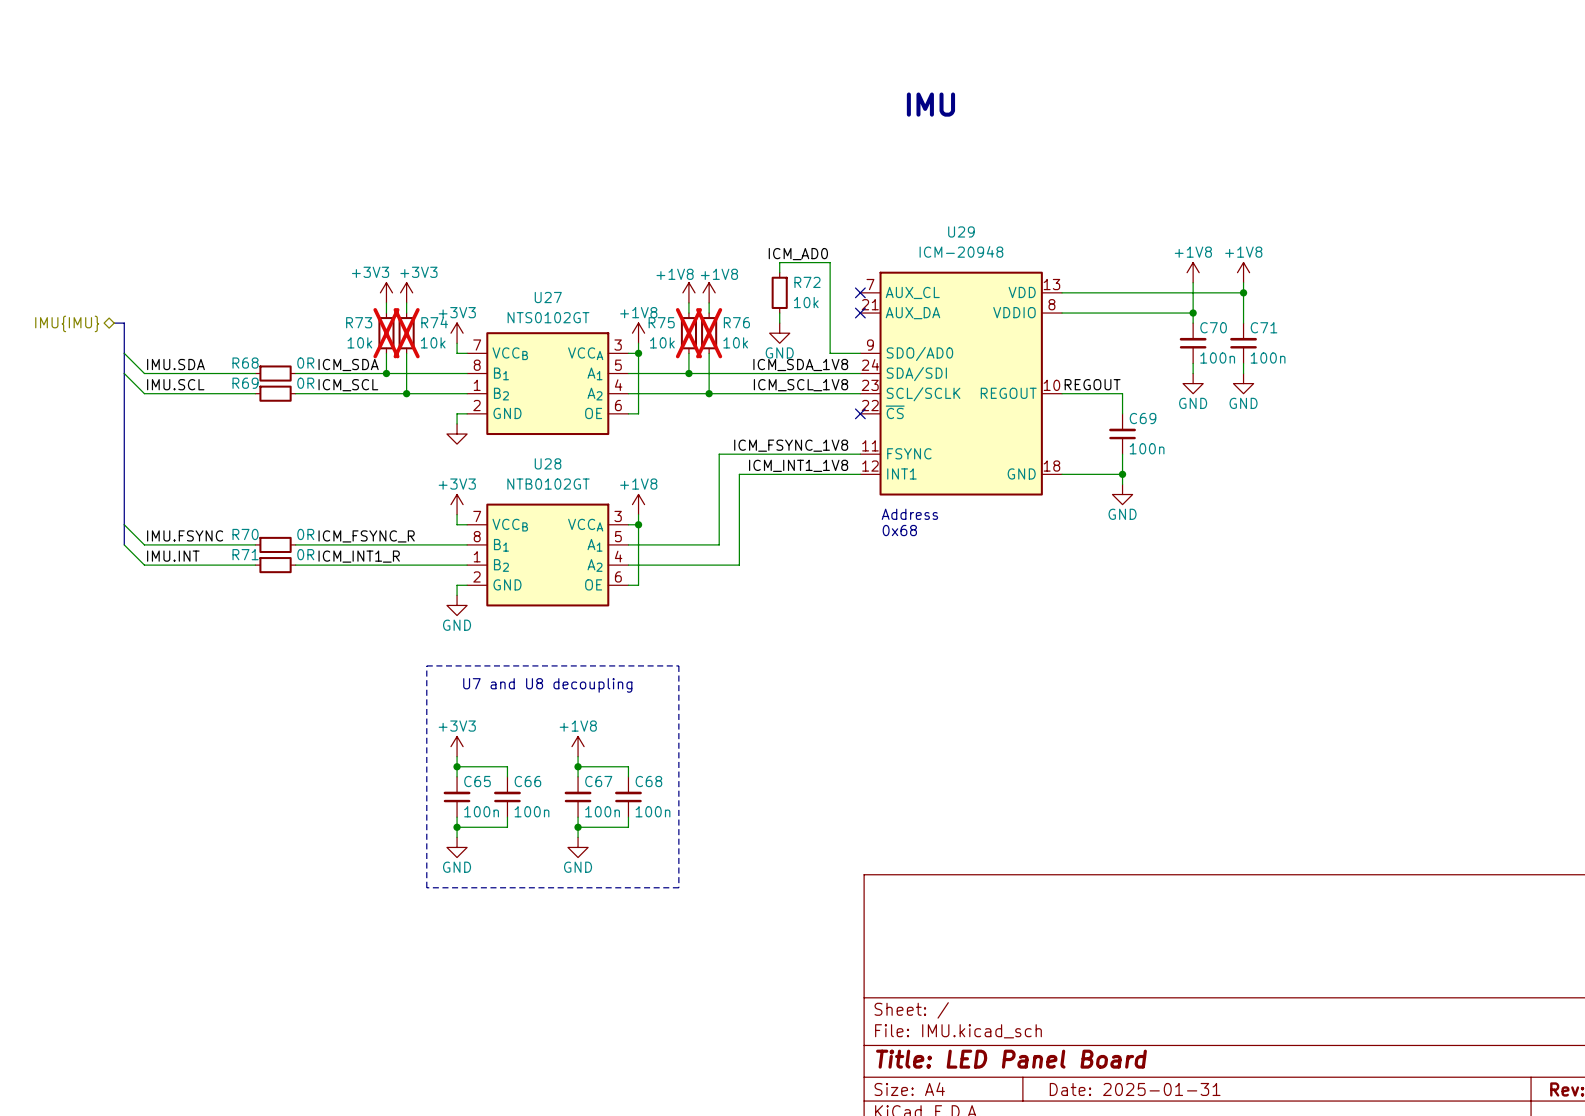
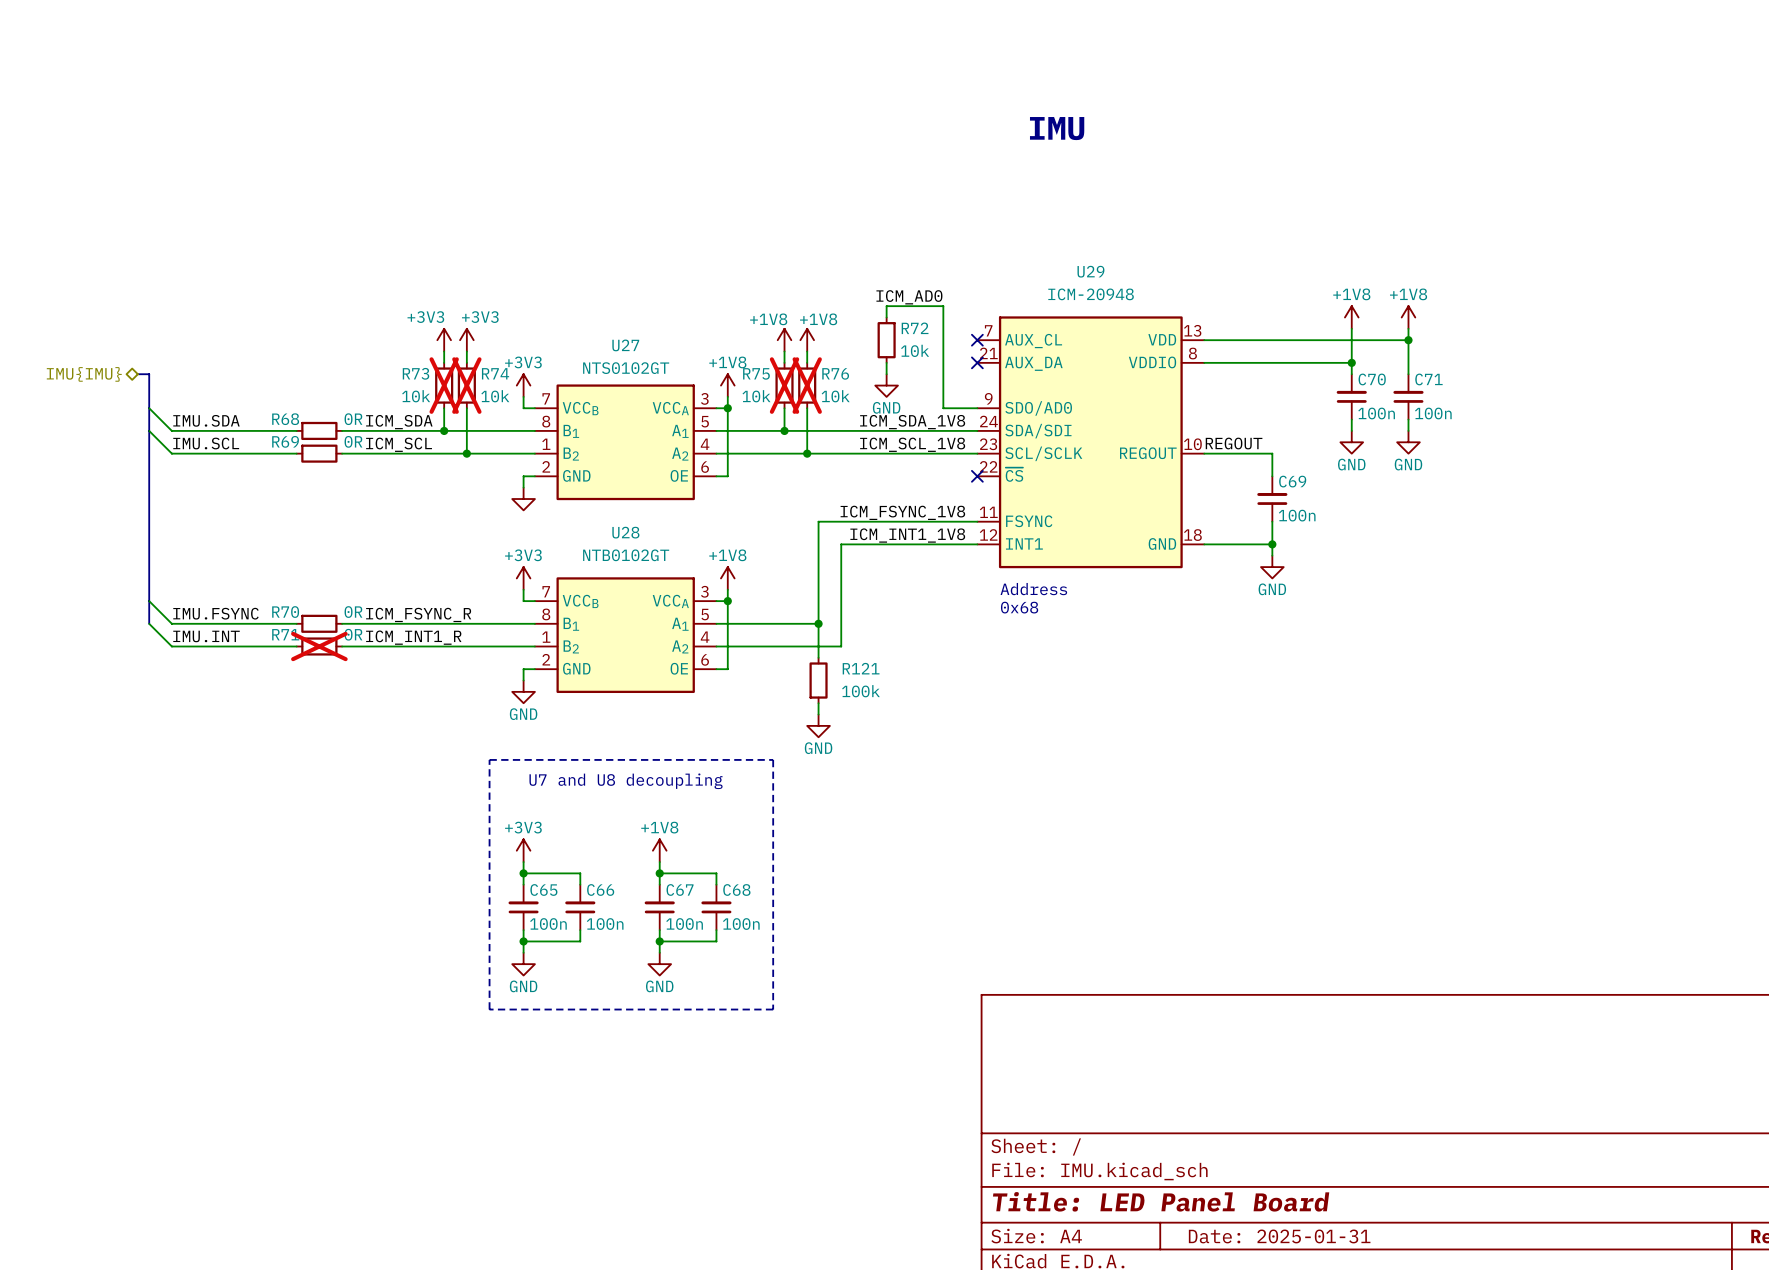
wire: none -> (818, 623) (818, 657)
junction: none -> (818, 623)
R71 do-not-place cross: none -> (319, 646)
R121: none -> (818, 680)
wire: none -> (818, 703) (818, 714)
power symbol: none -> GND (818, 725)

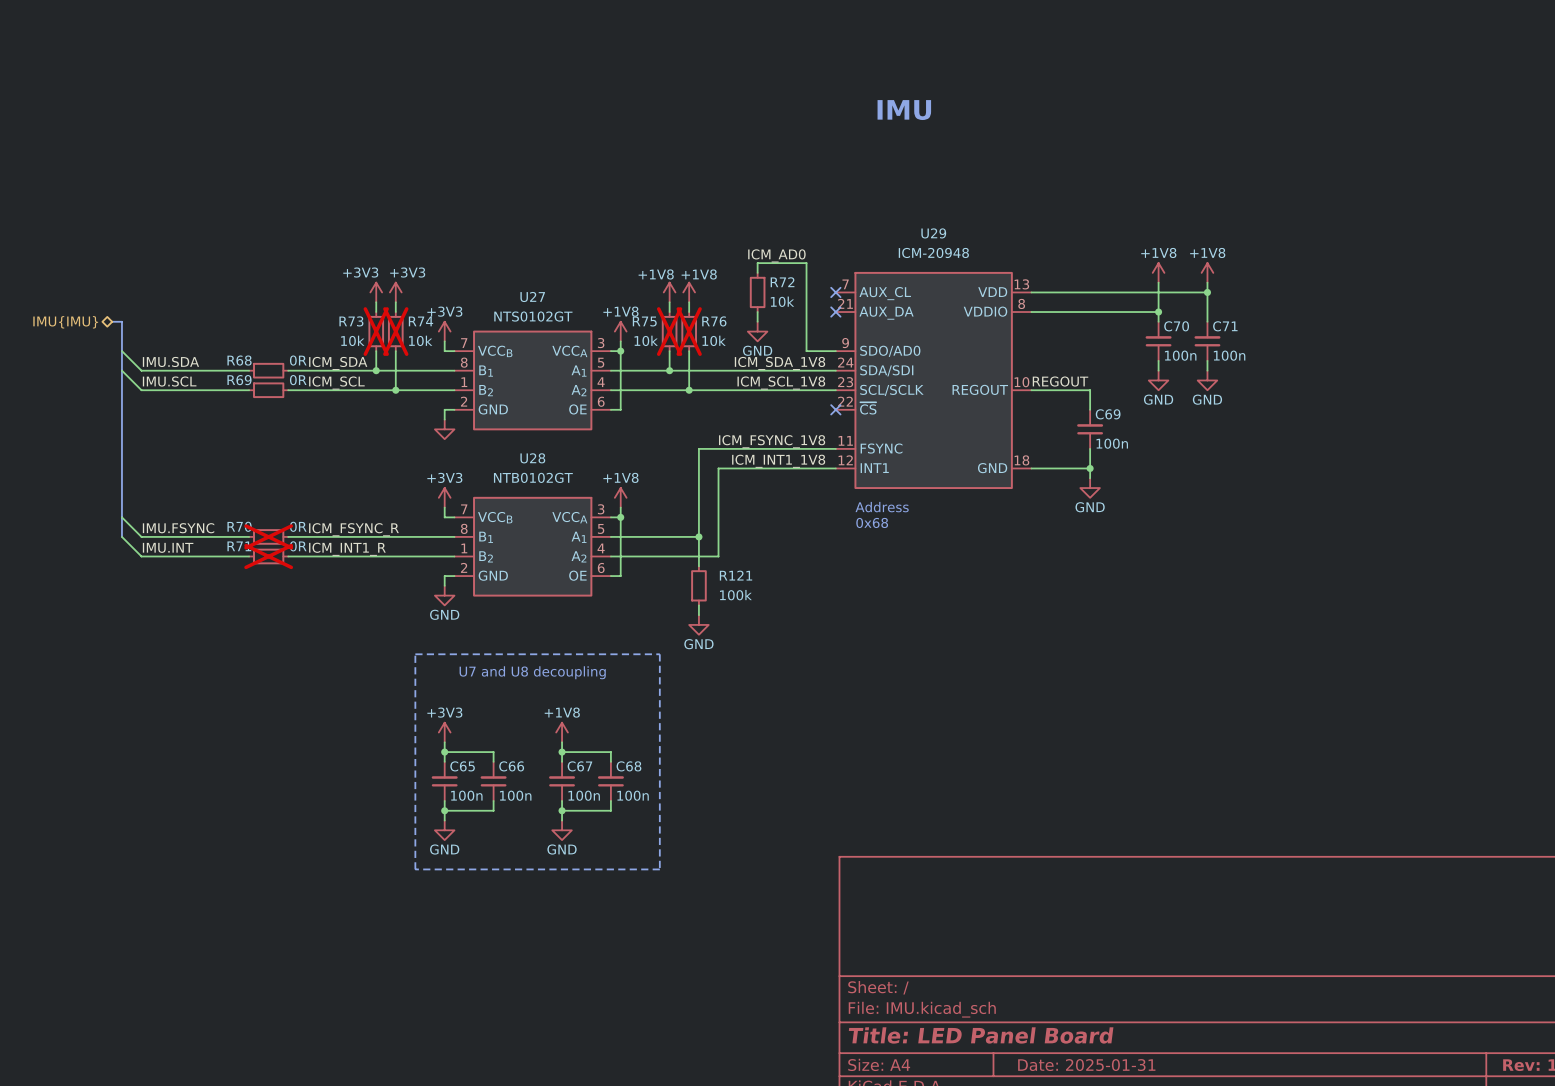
R70 do-not-place cross: none -> (268, 536)

